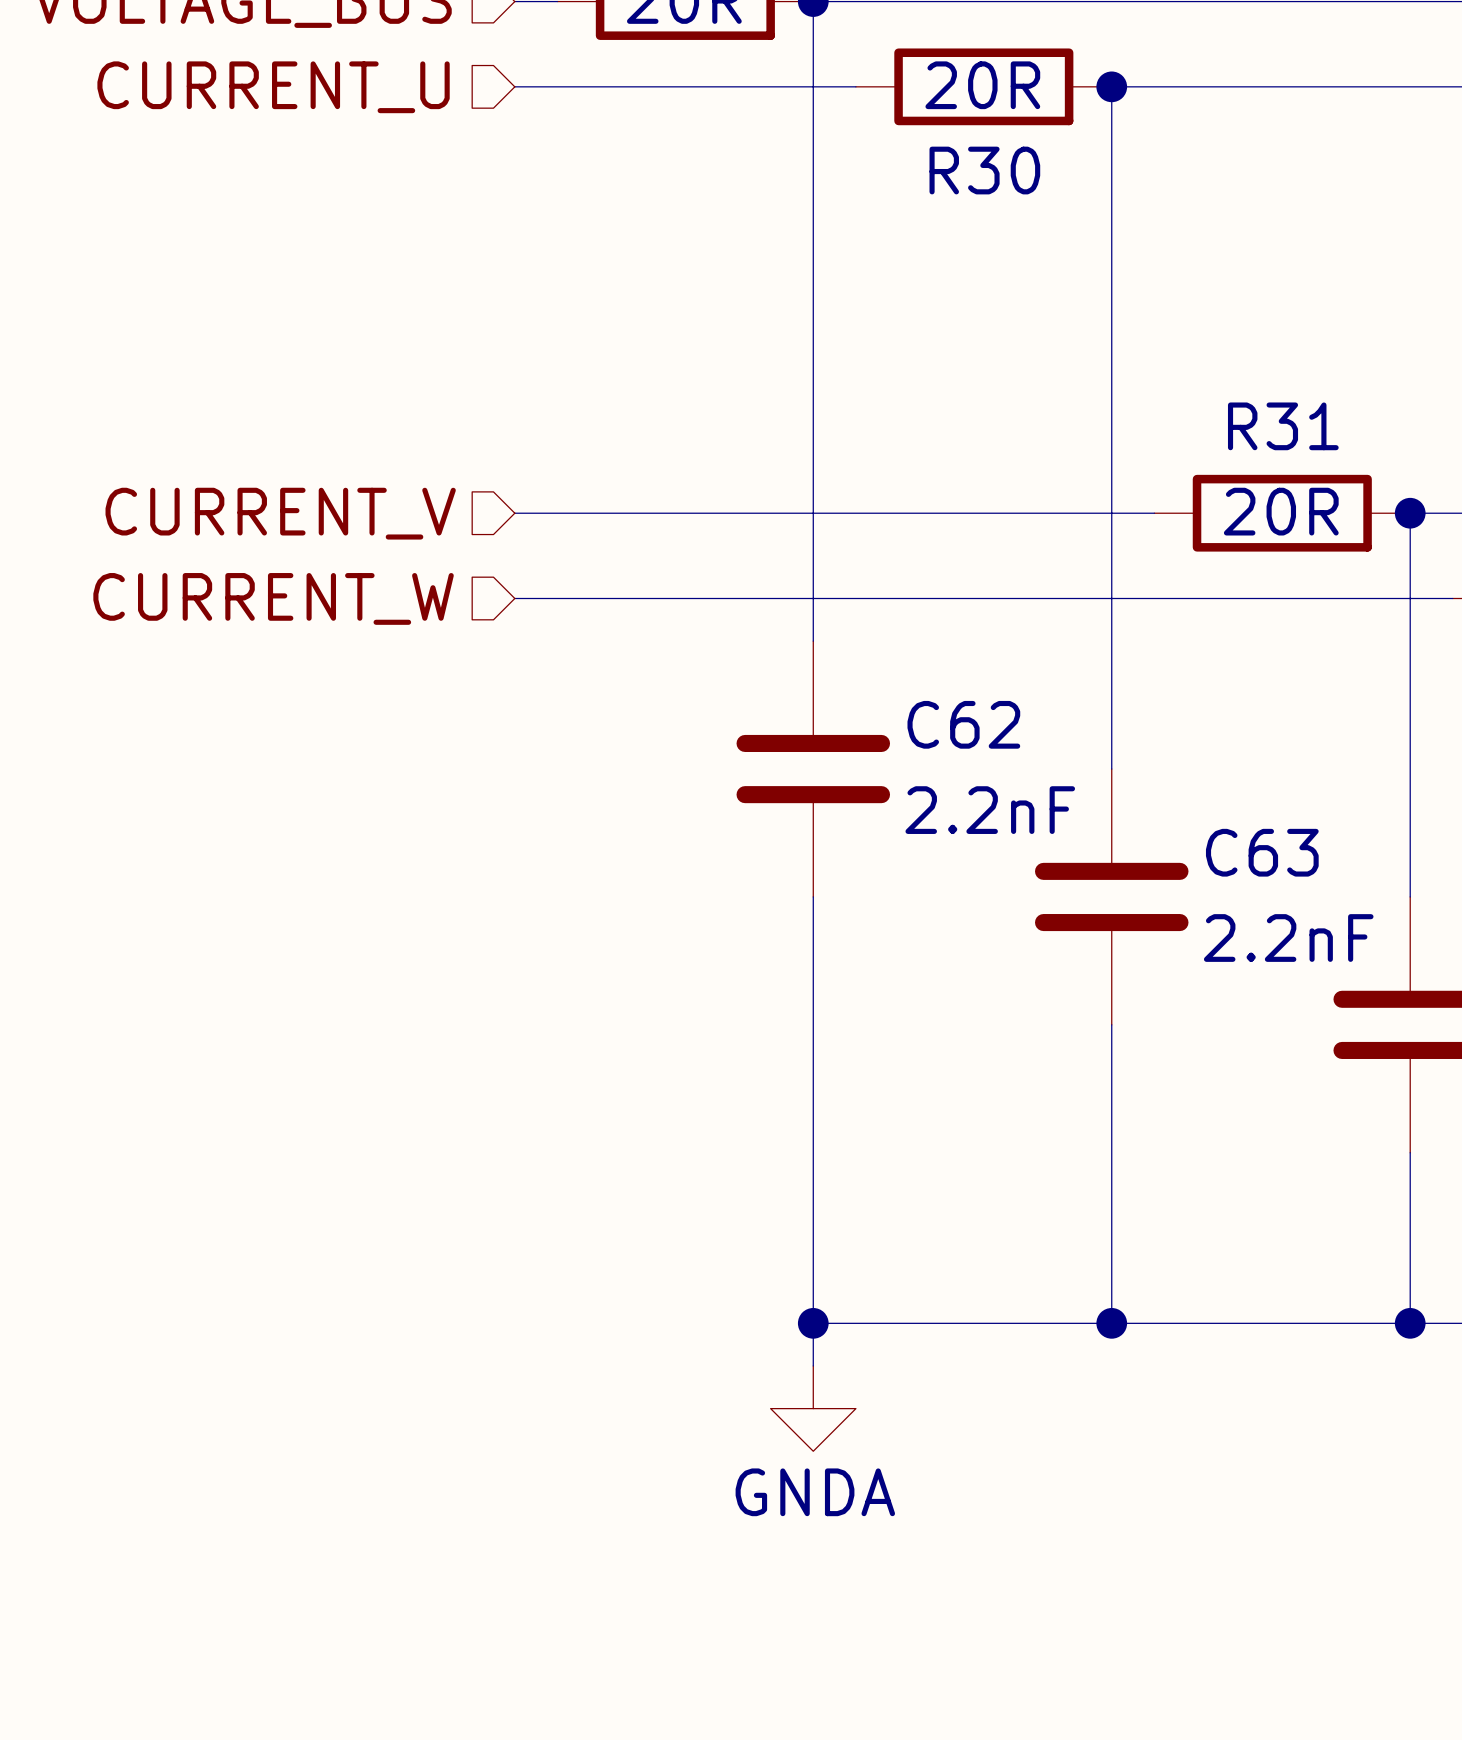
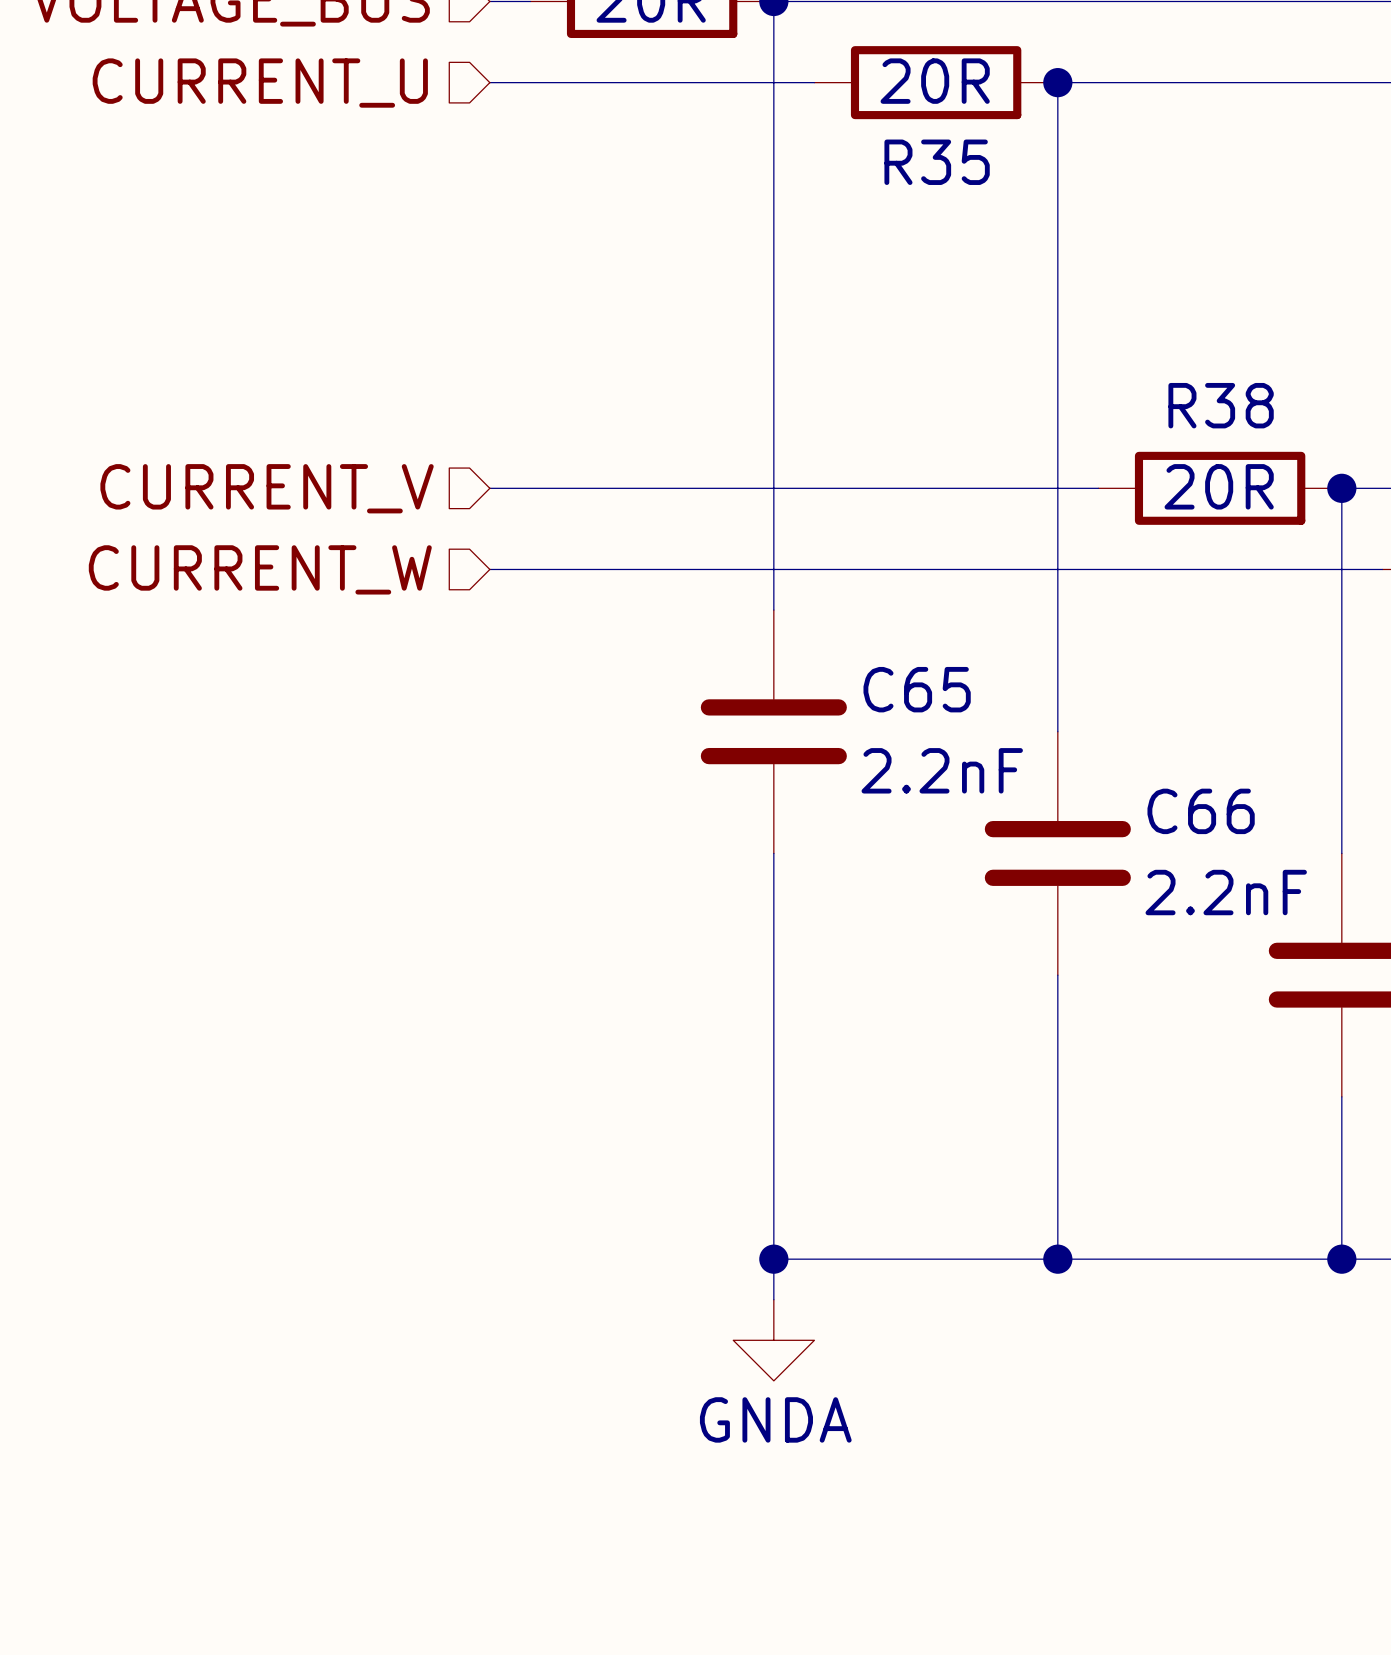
R30 name: R30 (984, 170) -> R35 (937, 162)
R31 name: R31 (1283, 426) -> R38 (1221, 405)
C62 name: C62 (963, 724) -> C65 (917, 689)
C63 name: C63 (1262, 852) -> C66 (1201, 811)

